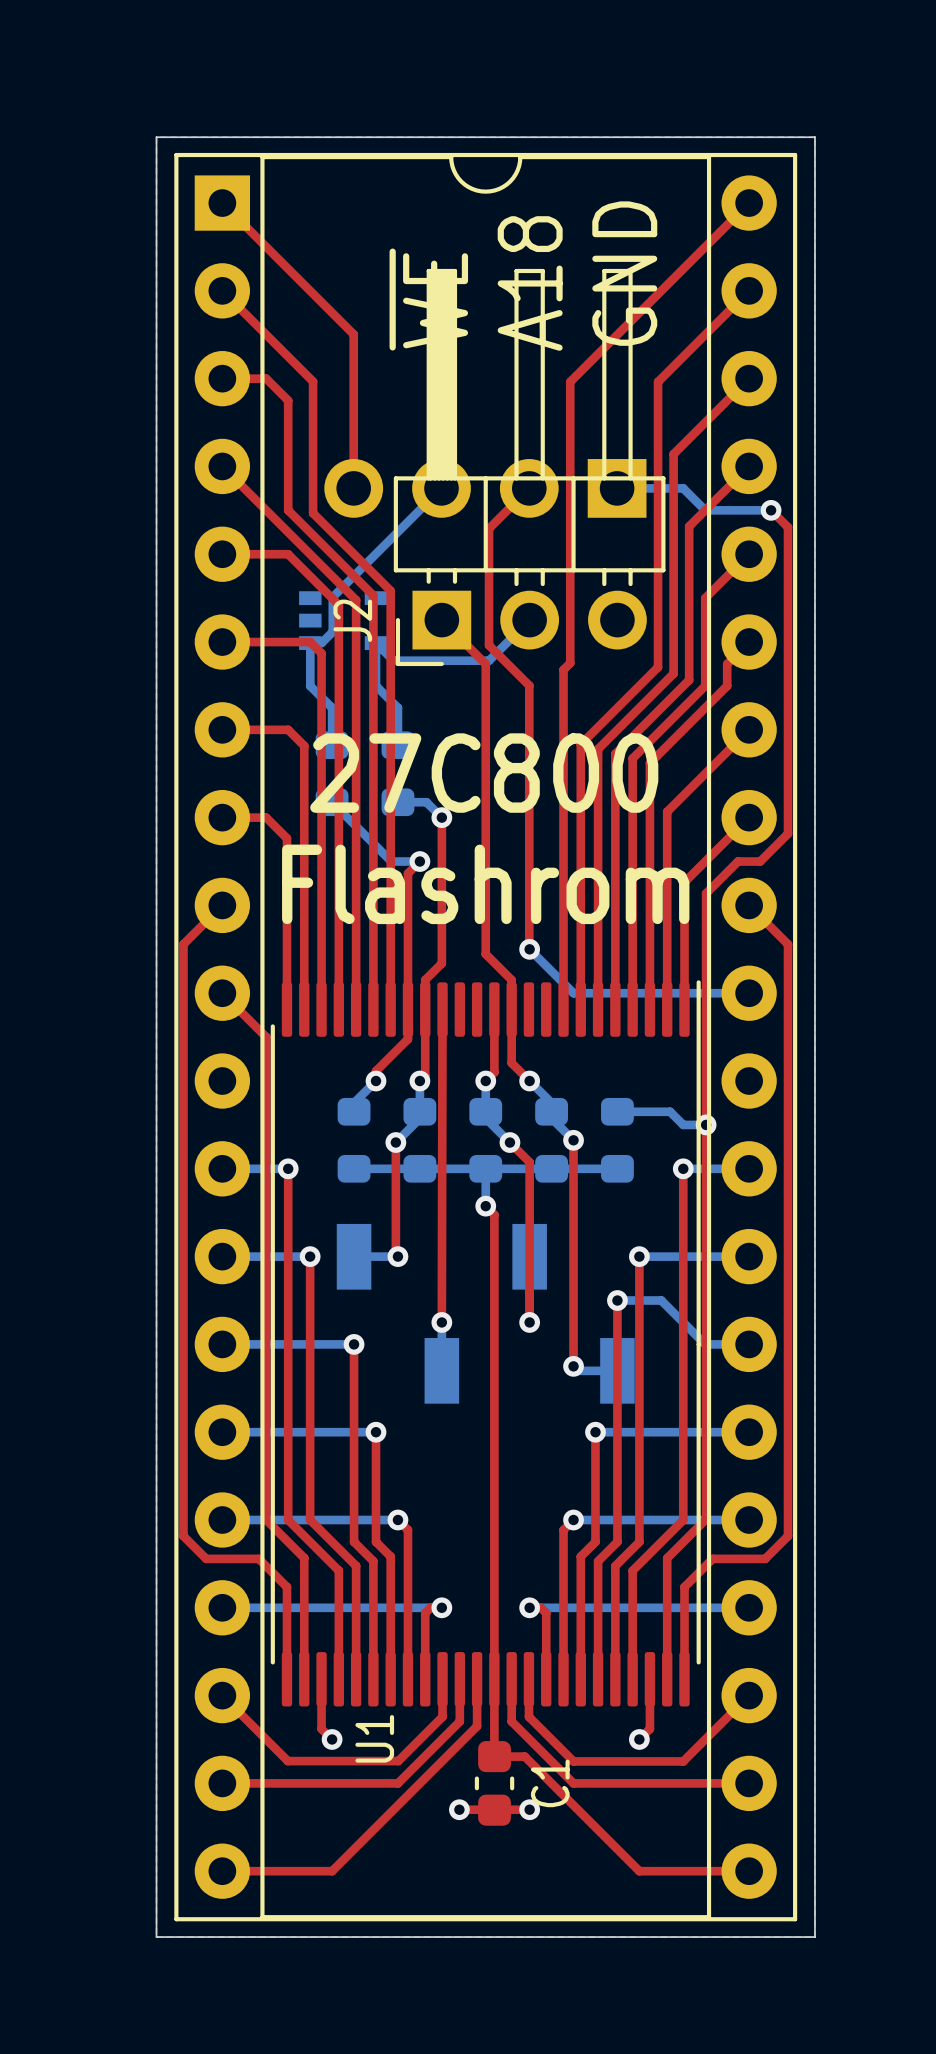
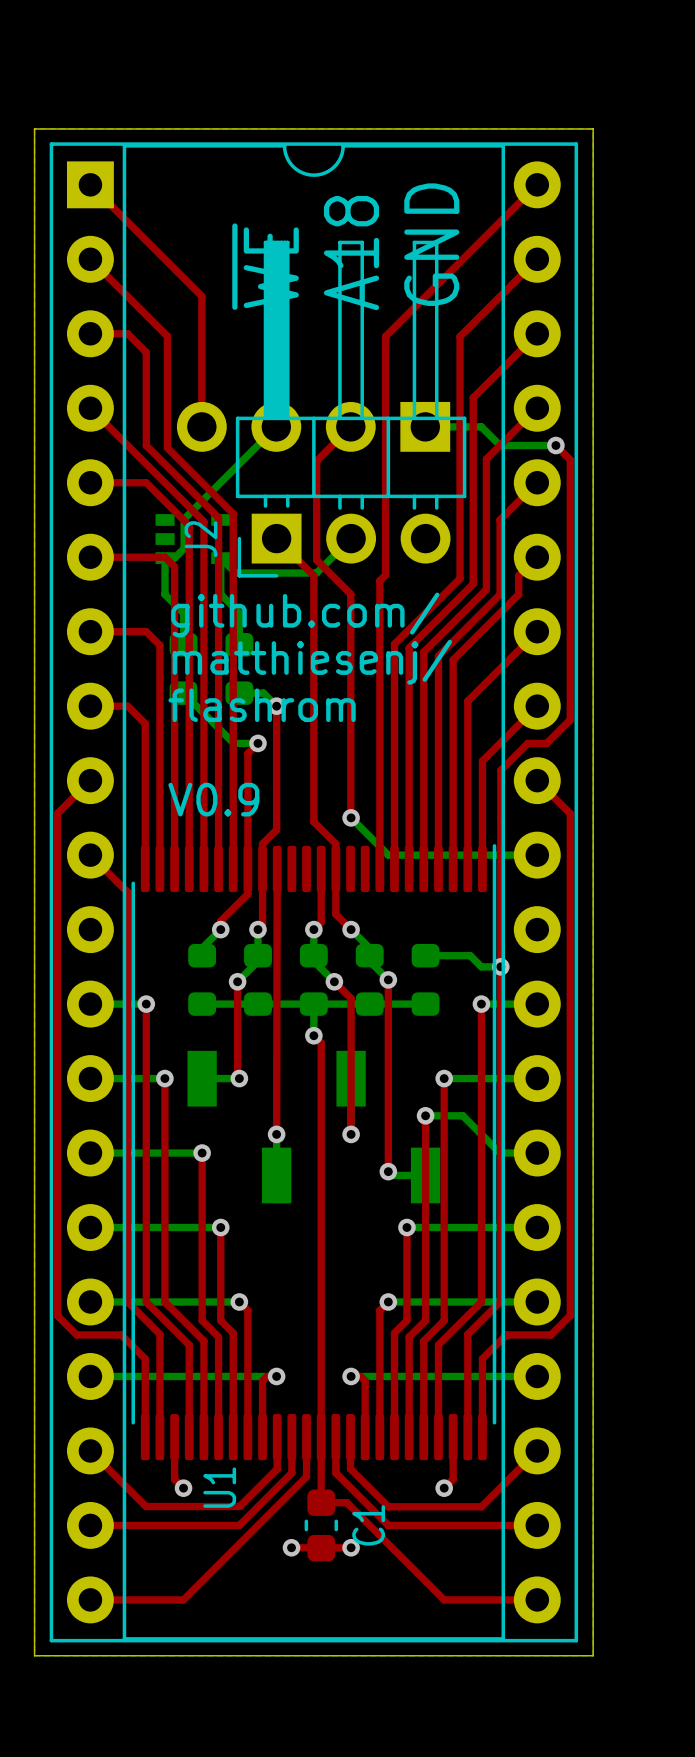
text: none -> github.com/ (305, 614)
text: none -> matthiesenj/ (312, 662)
text: 27C800 (484, 773) -> none
text: Flashrom (485, 884) -> flashrom (262, 705)
text: none -> V0.9 (213, 799)

